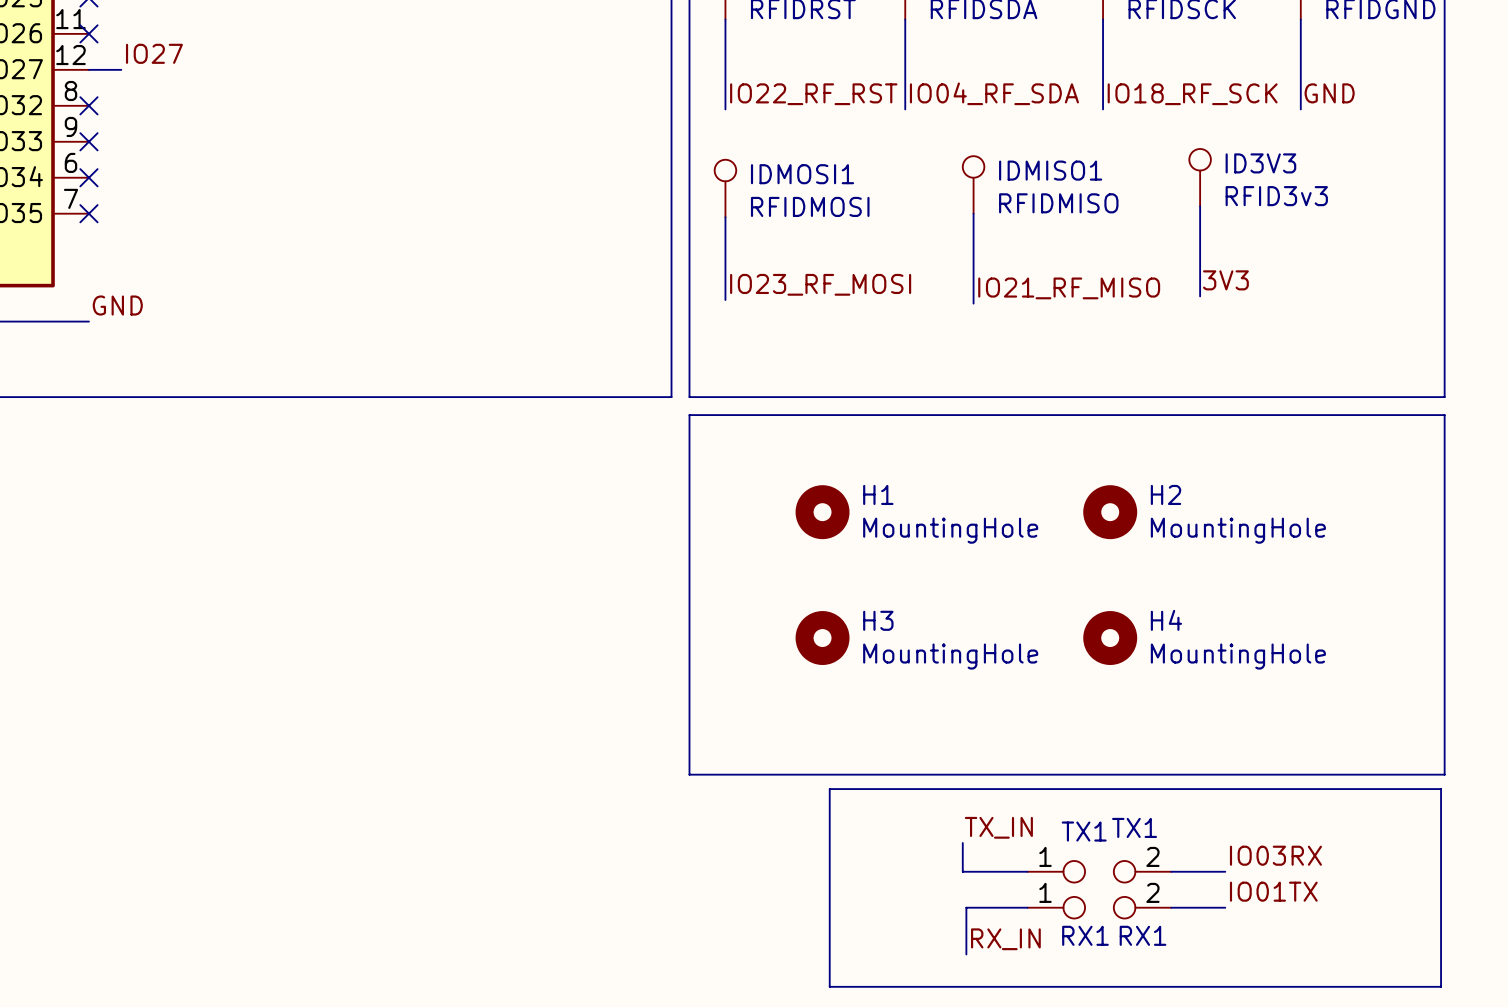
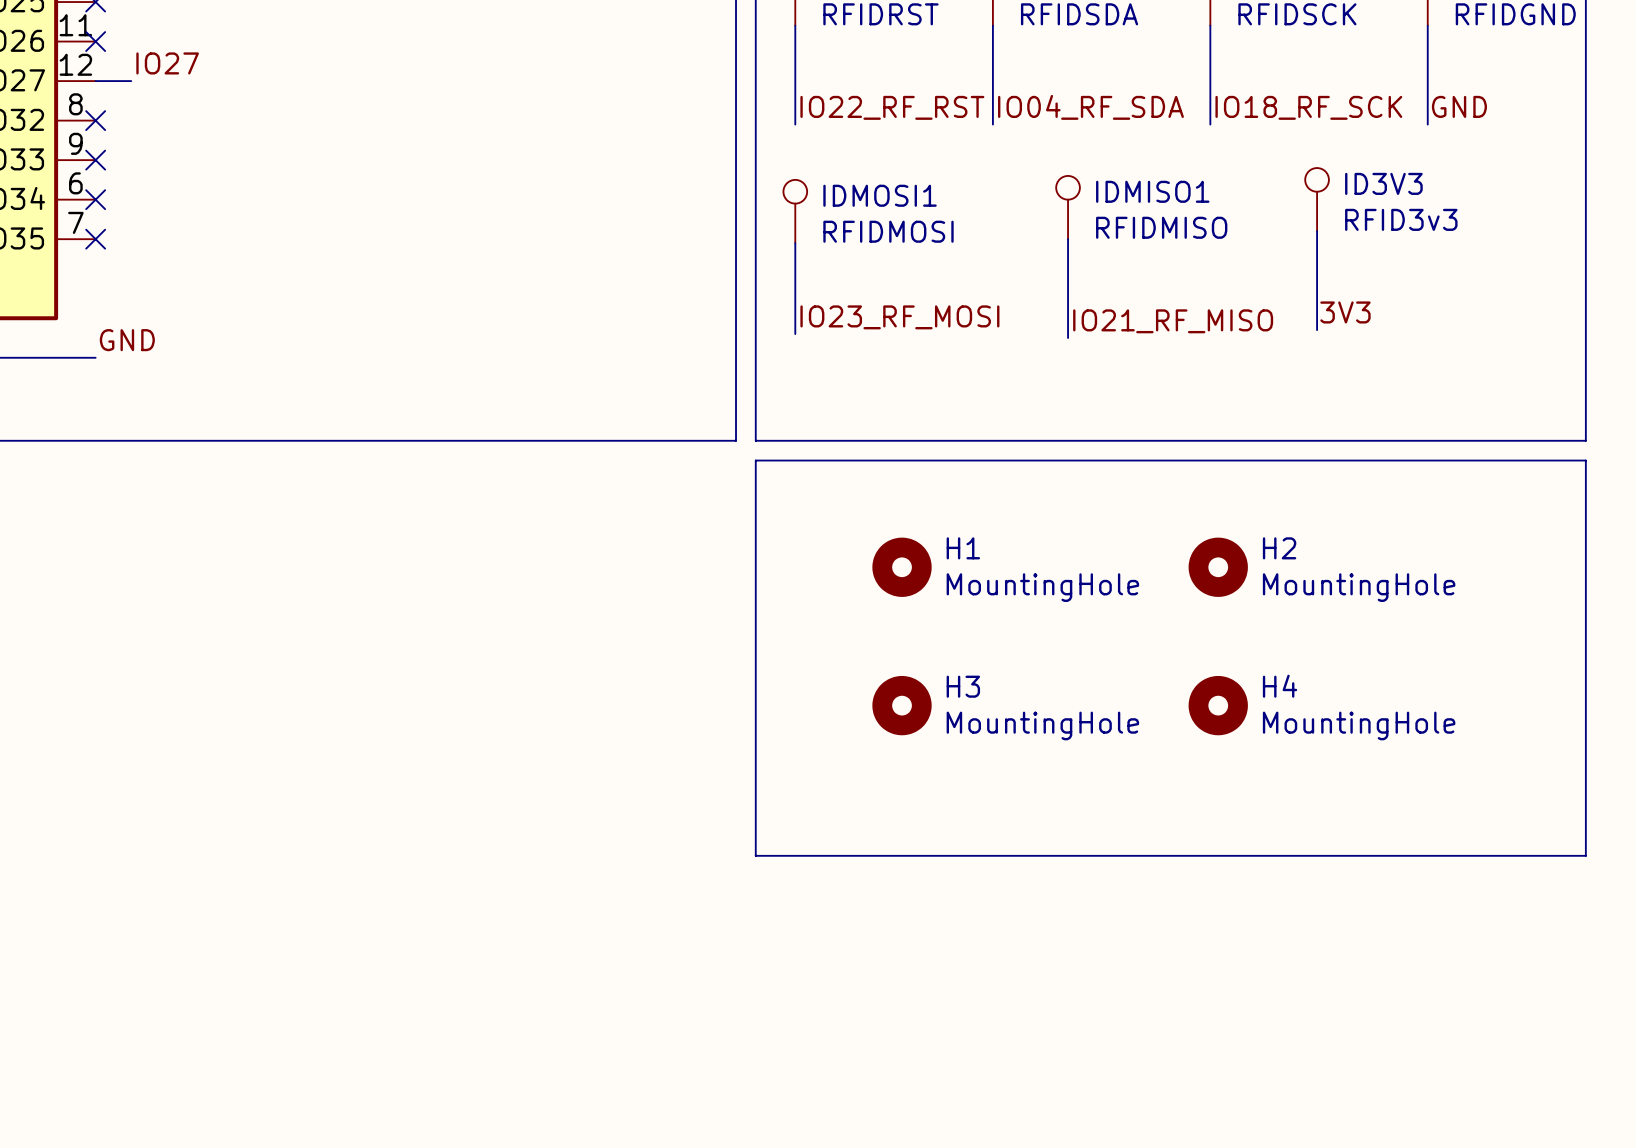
line: (829, 789) (1441, 789) (1441, 986) (829, 986) (829, 789) -> none
label: TX_IN (998, 827) -> none
wire: (962, 842) (962, 871) (1027, 871) -> none
label: IO03RX (1275, 855) -> none
TX1: TX1 (1099, 871) -> none
wire: (1171, 871) (1225, 871) -> none
label: IO01TX (1273, 891) -> none
wire: (1027, 907) (966, 907) (966, 954) -> none
RX1: RX1 (1099, 907) -> none
wire: (1171, 907) (1225, 907) -> none
label: RX_IN (1005, 939) -> none

